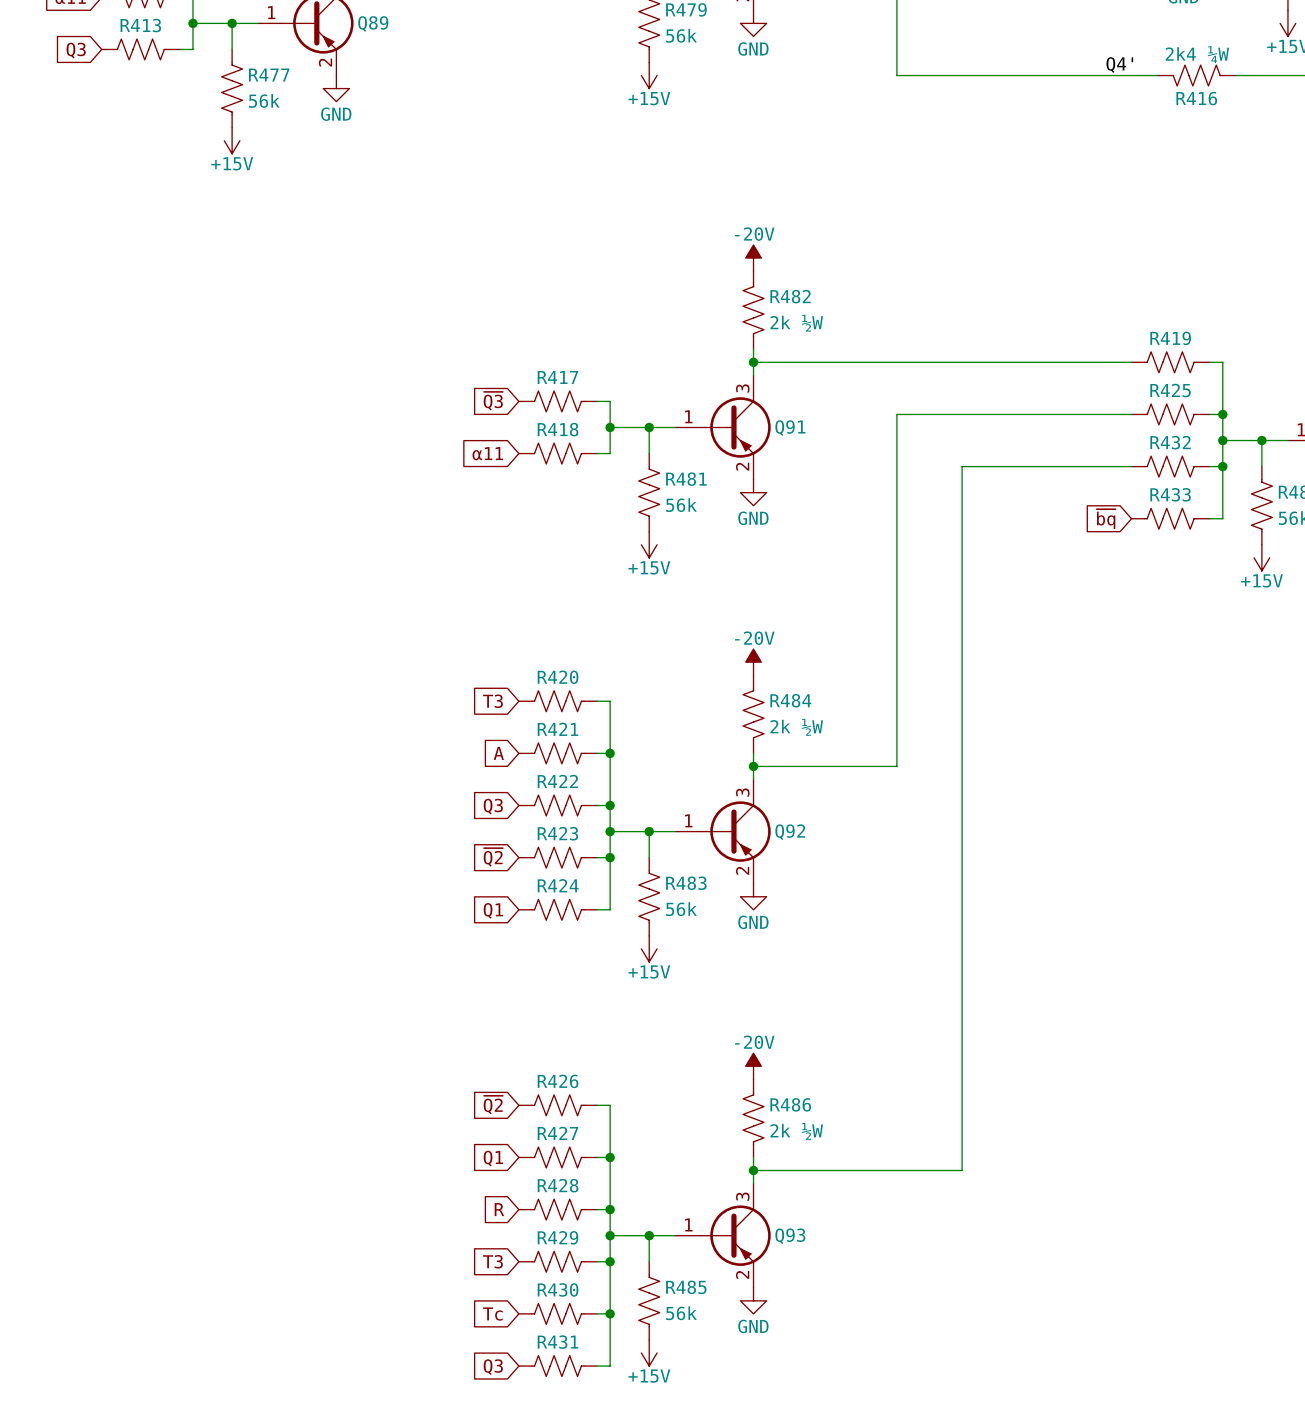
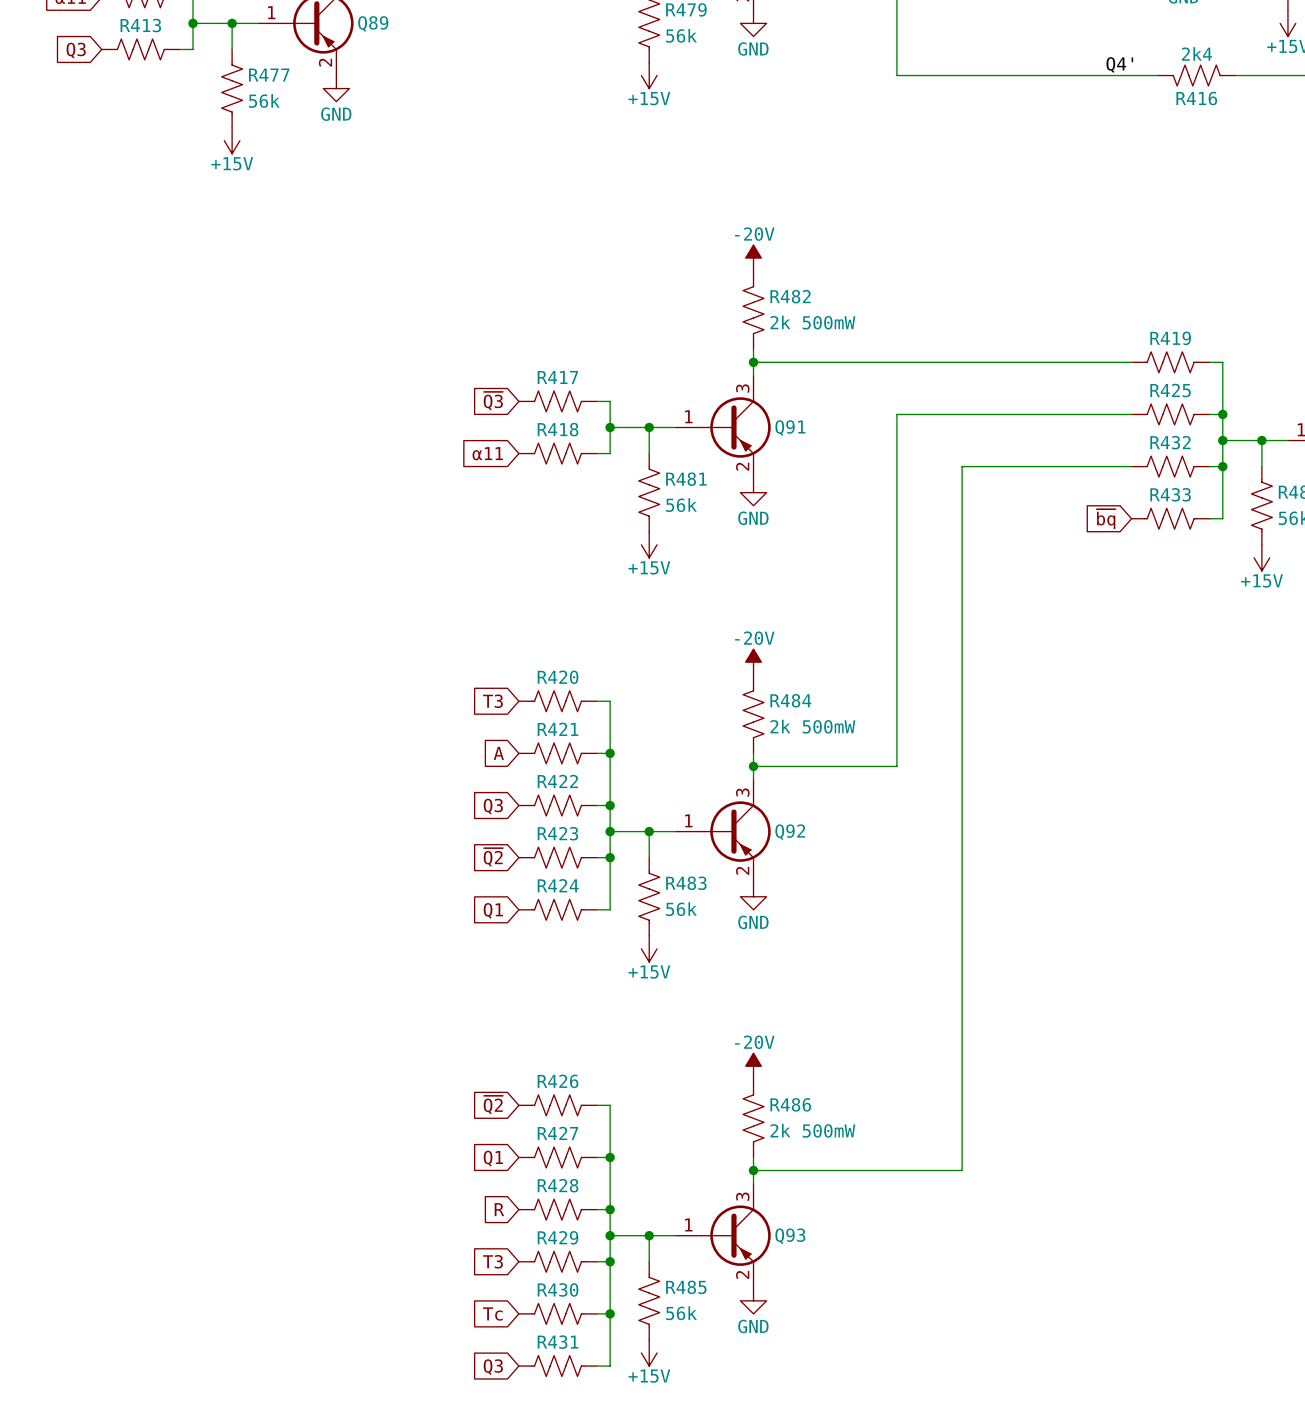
R416 value: 2k4 ¼W (1197, 54) -> 2k4 (1196, 53)
R482 value: 2k ½W (796, 323) -> 2k 500mW (812, 322)
R484 value: 2k ½W (796, 727) -> 2k 500mW (812, 726)
R486 value: 2k ½W (796, 1131) -> 2k 500mW (812, 1130)

